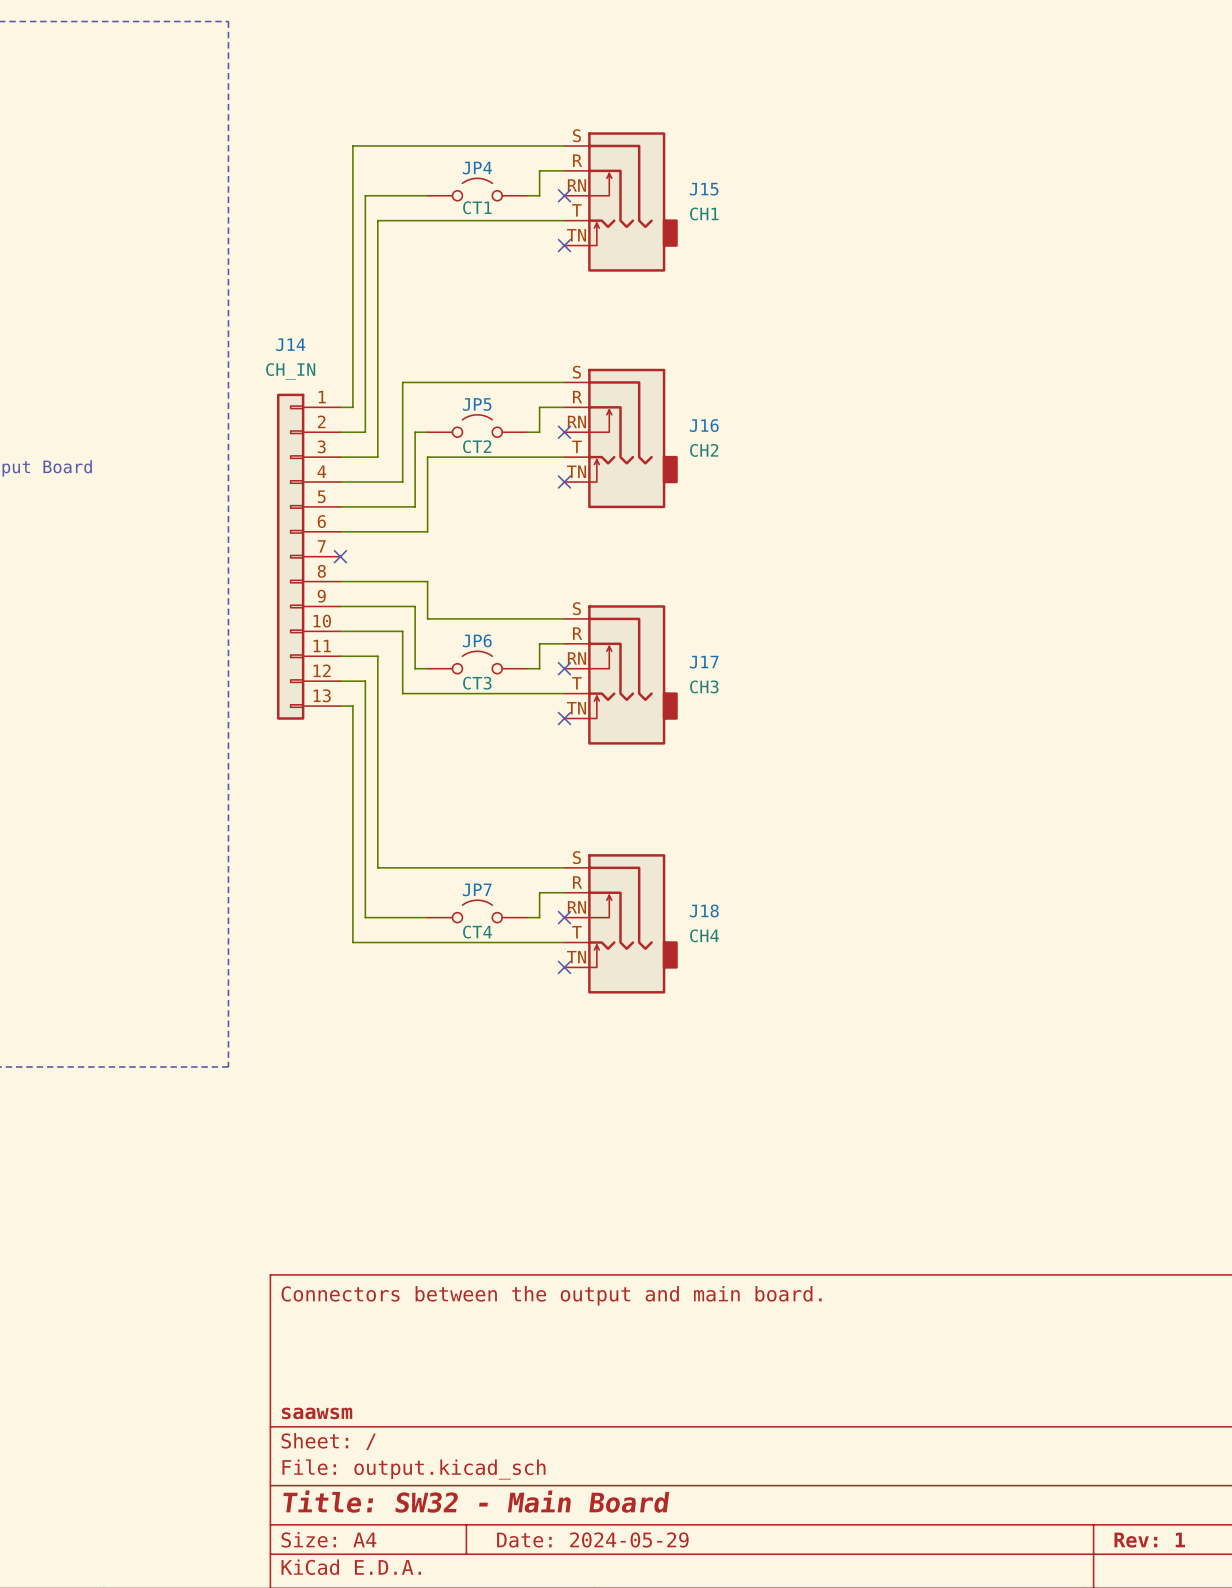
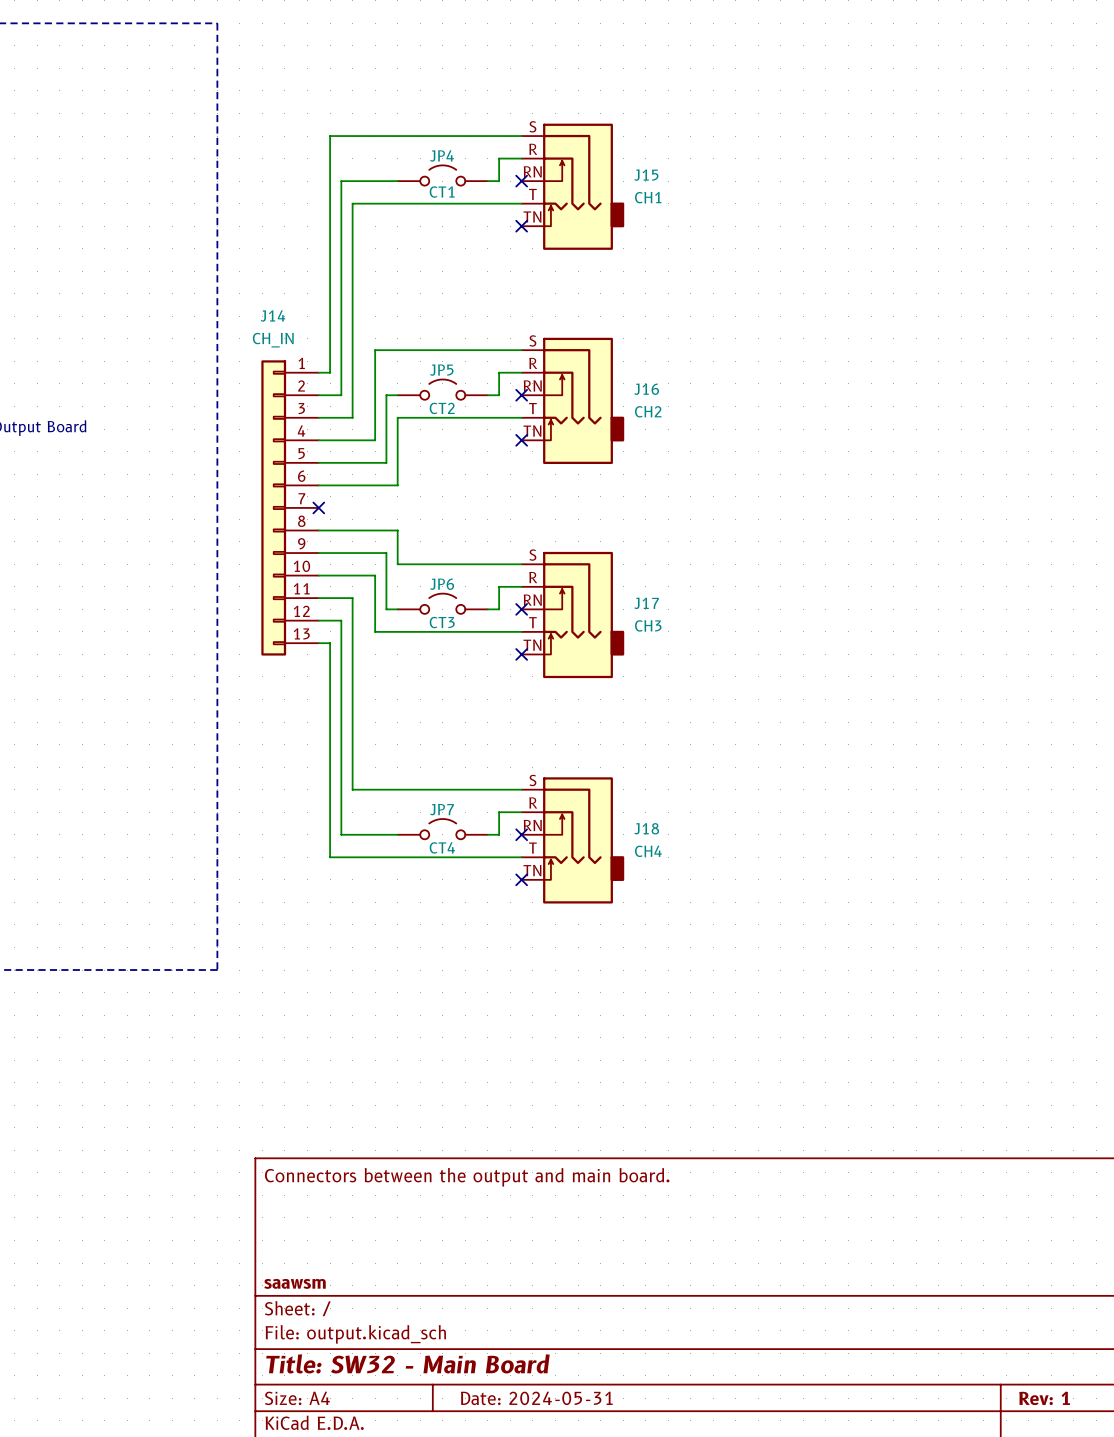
title block: Date: 2024-05-29 (592, 1539) -> Date: 2024-05-31 (536, 1398)

